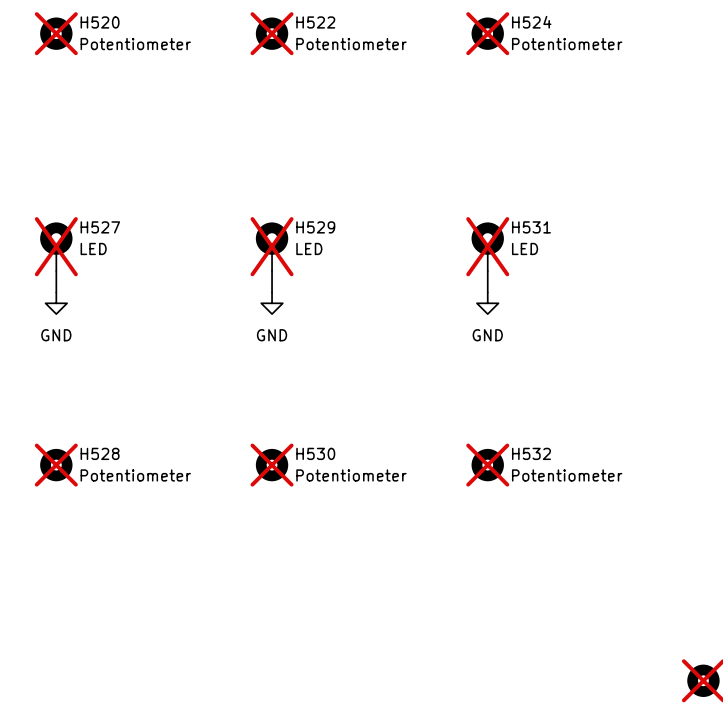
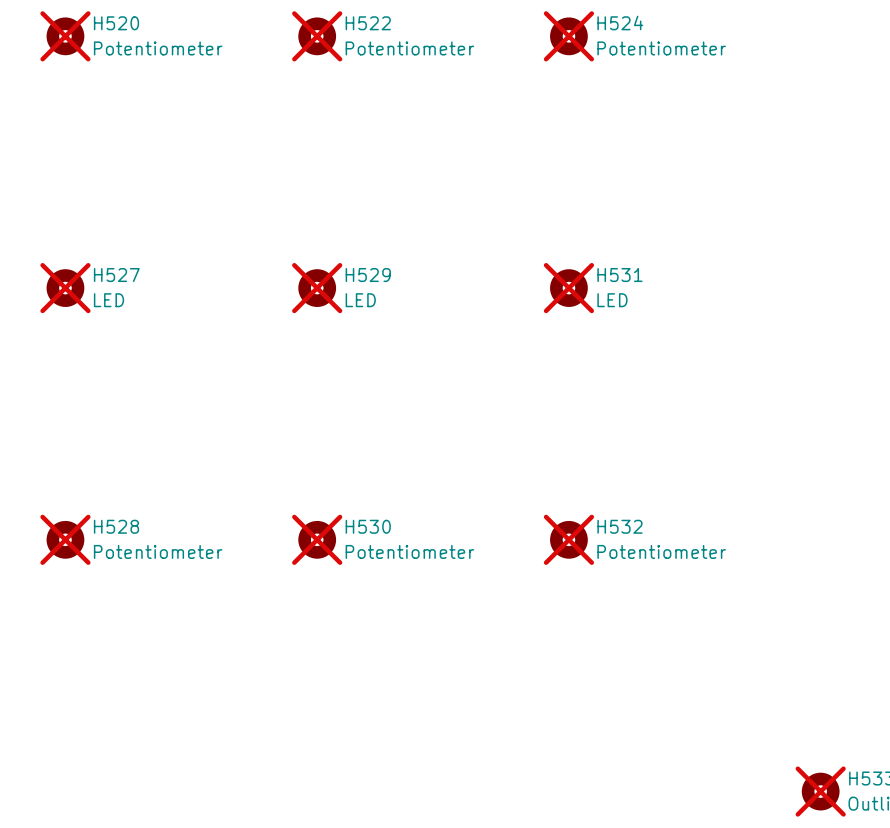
H527 symbol: [40, 222, 73, 271] -> [46, 269, 85, 307]
H529 symbol: [255, 222, 289, 271] -> [298, 269, 337, 307]
H531 symbol: [471, 222, 504, 271] -> [550, 269, 588, 307]
wire: (56, 270) (56, 292) -> none
wire: (272, 270) (272, 292) -> none
wire: (487, 270) (487, 292) -> none
power symbol: GND (56, 303) -> none
power symbol: GND (272, 303) -> none
power symbol: GND (487, 303) -> none

